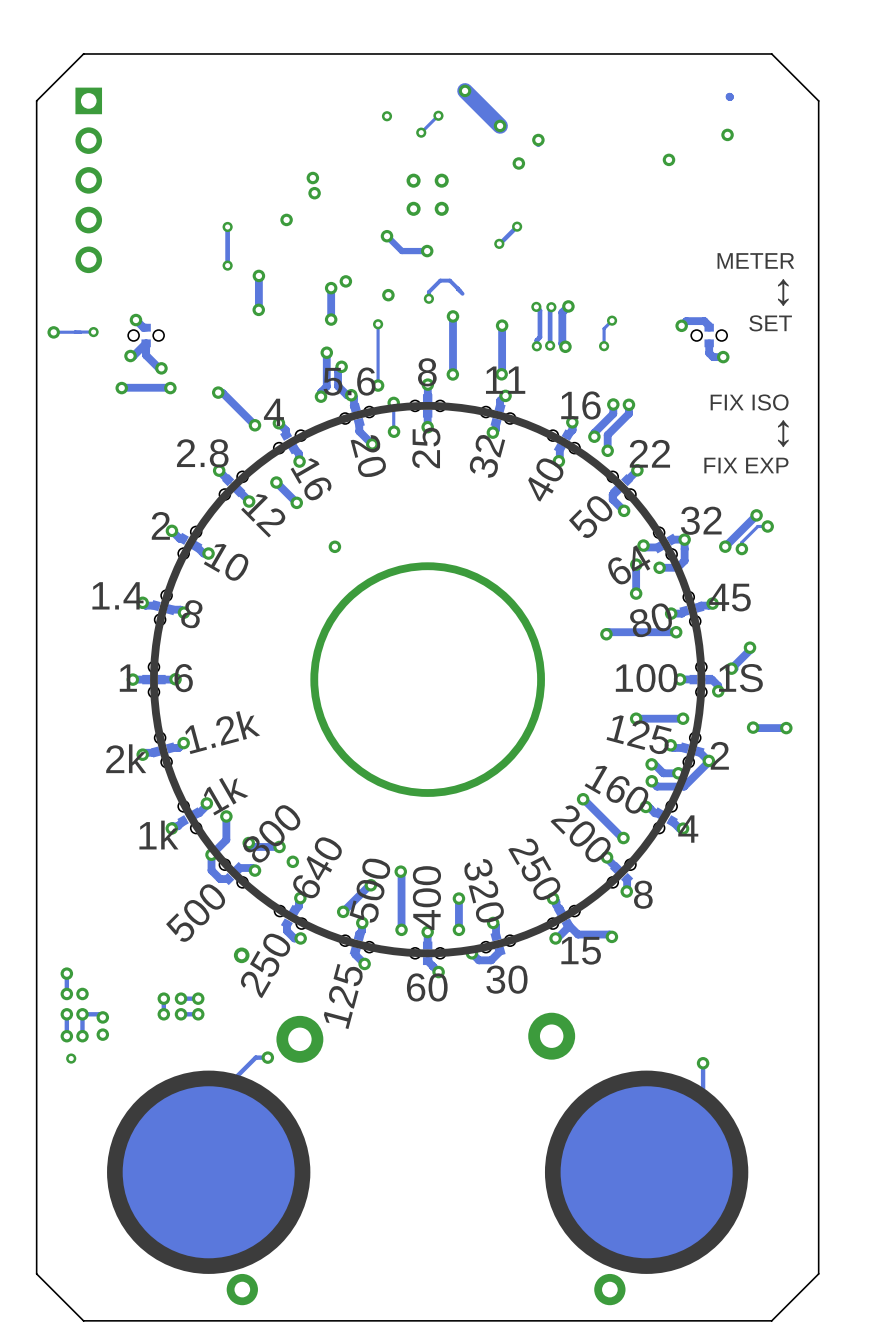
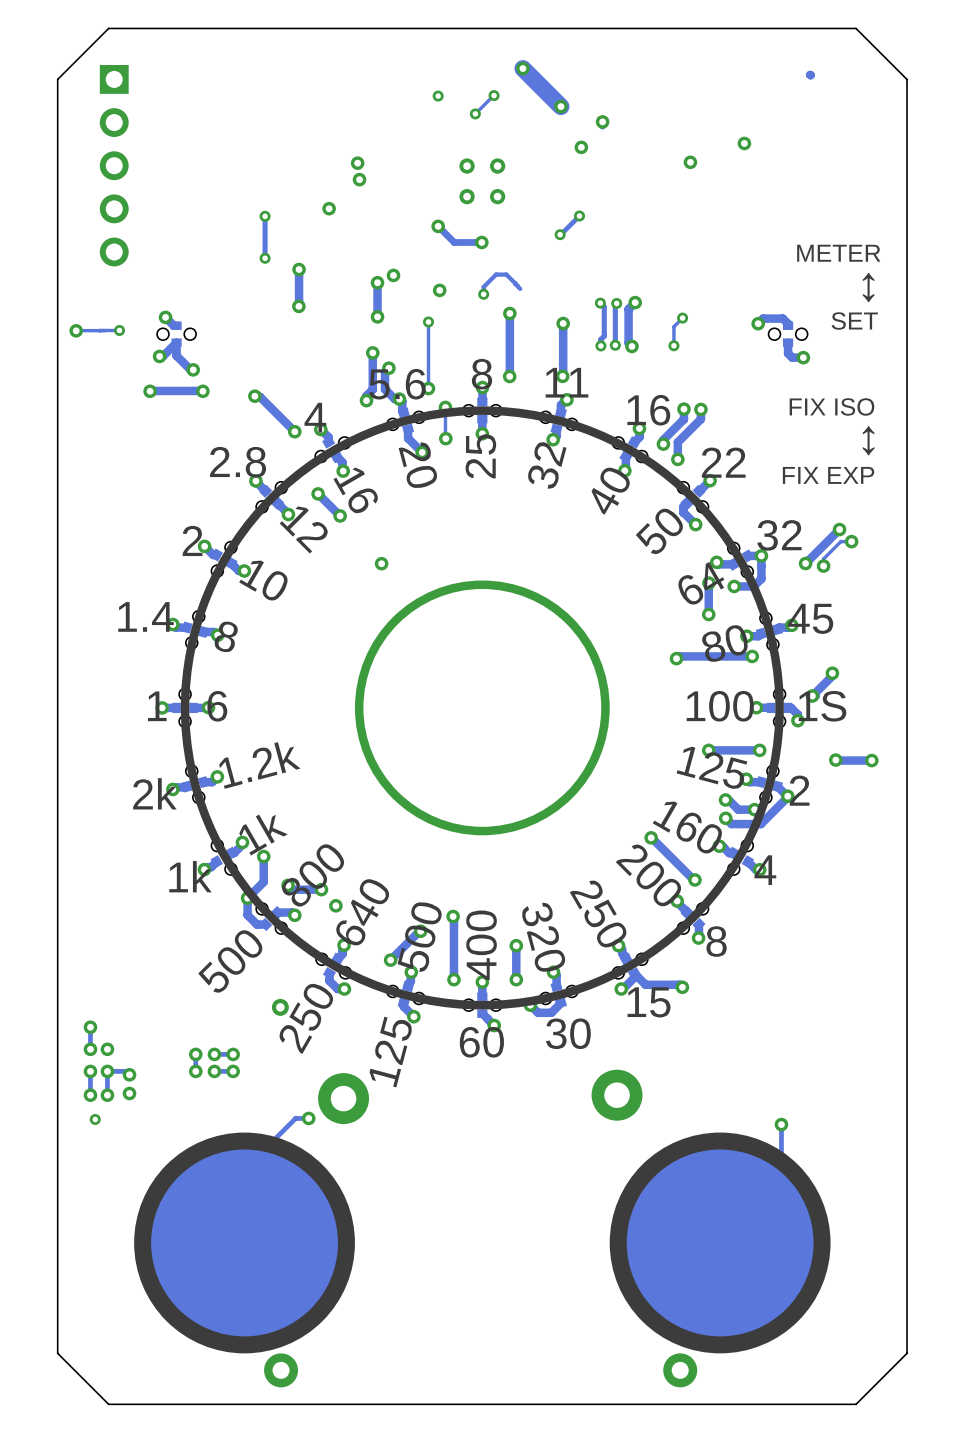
via: (727, 134) -> none
via: none -> (690, 162)

